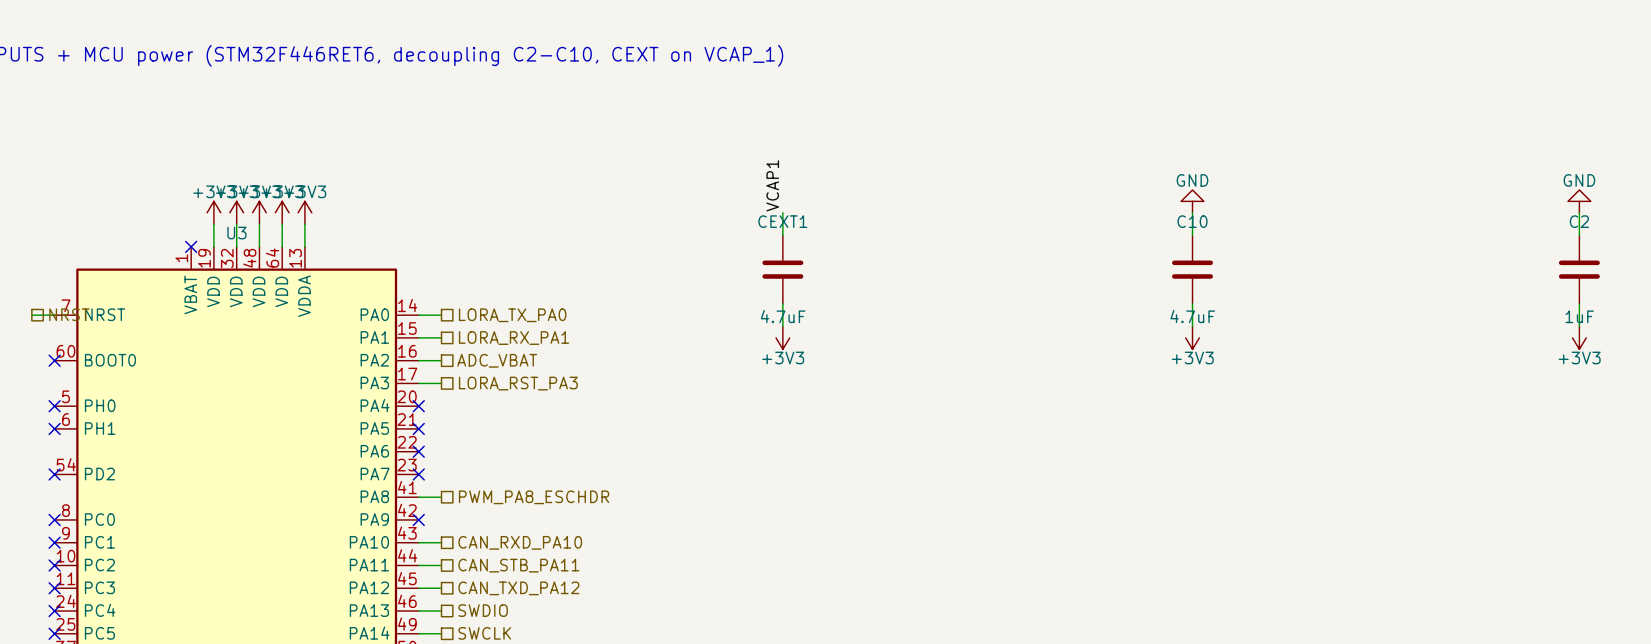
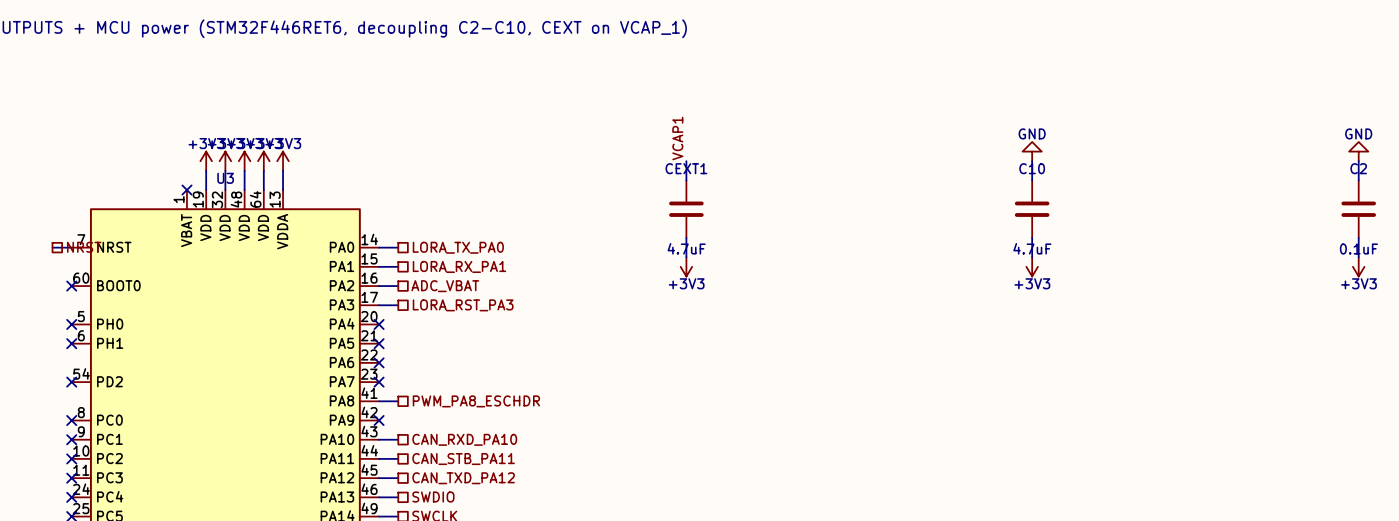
C2 value: 1uF (1579, 316) -> 0.1uF (1358, 249)

